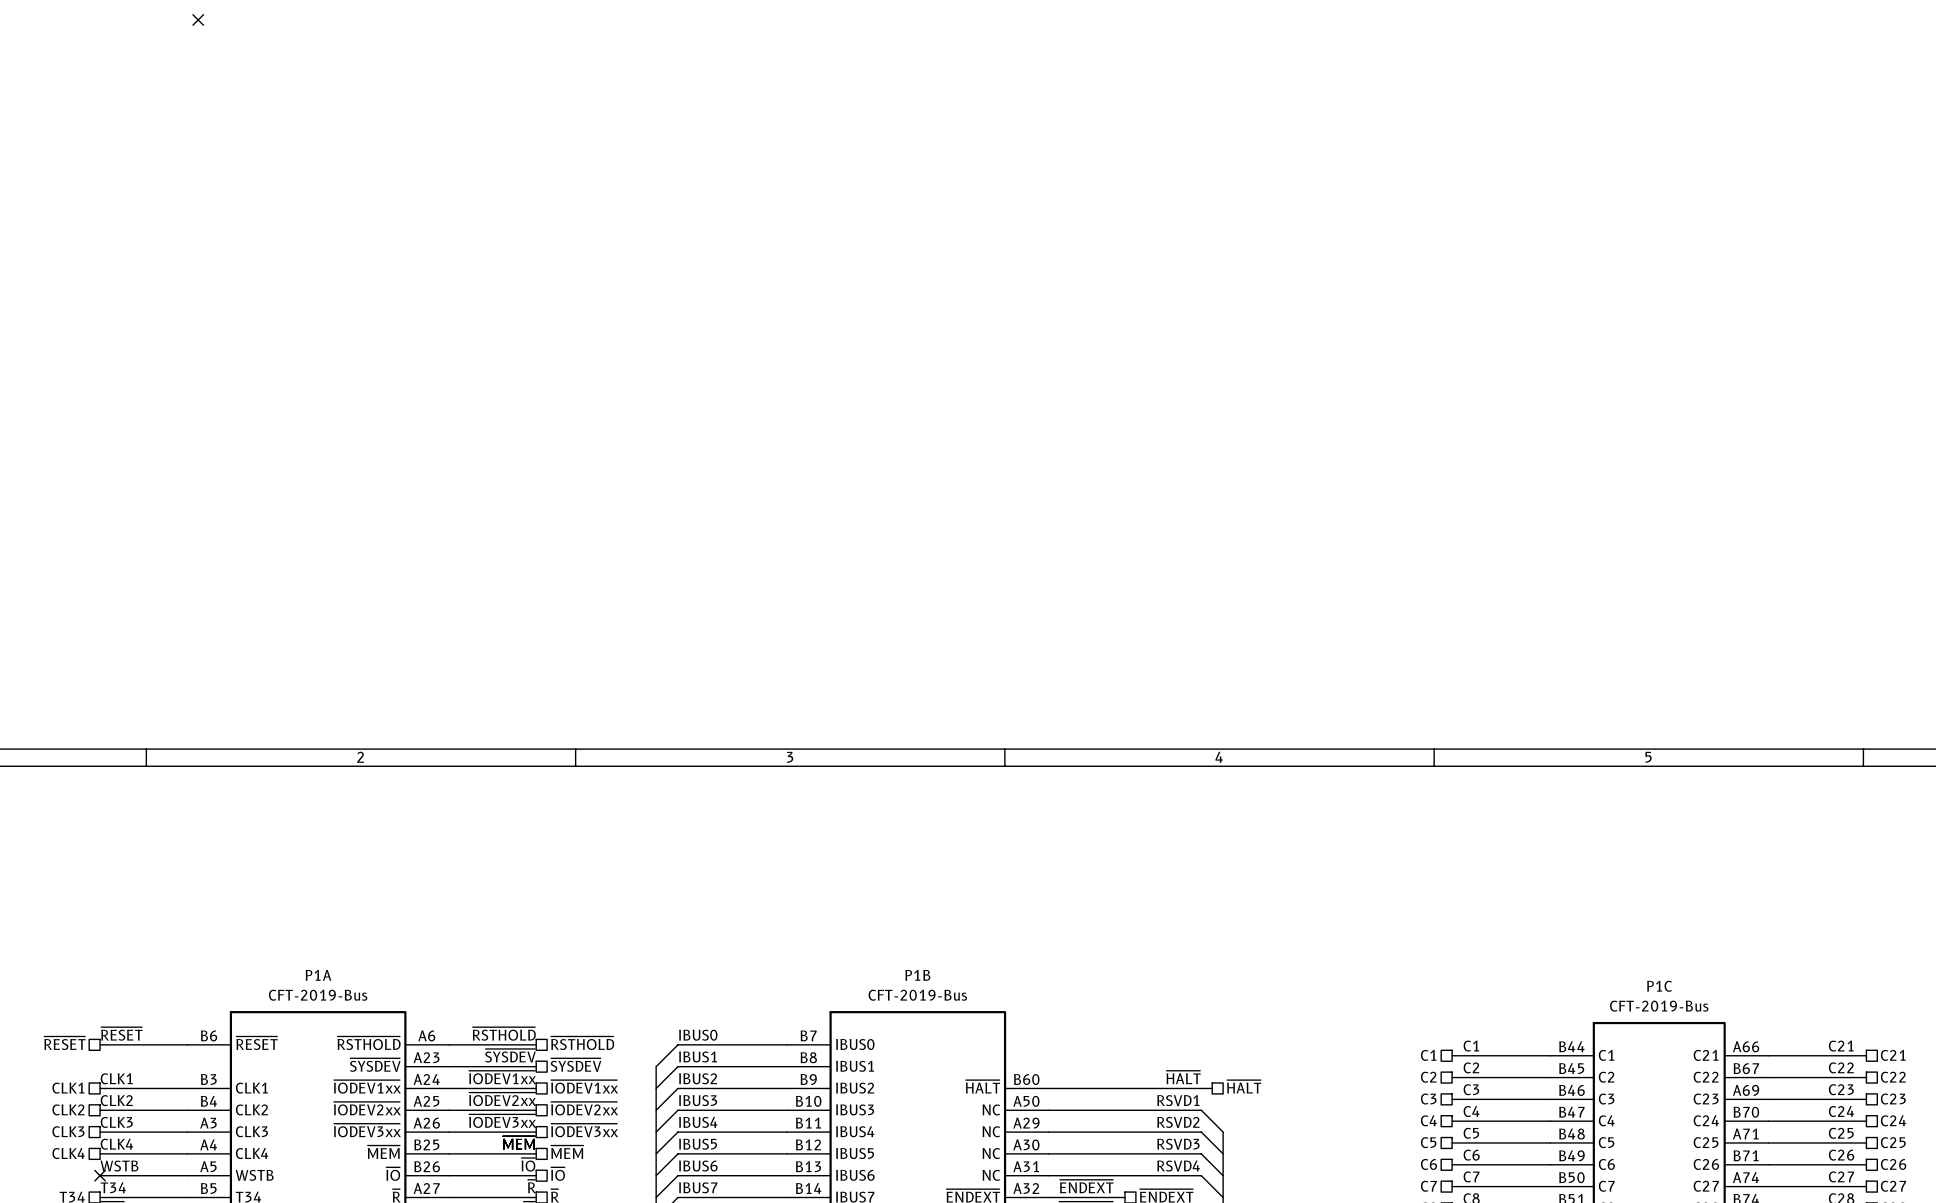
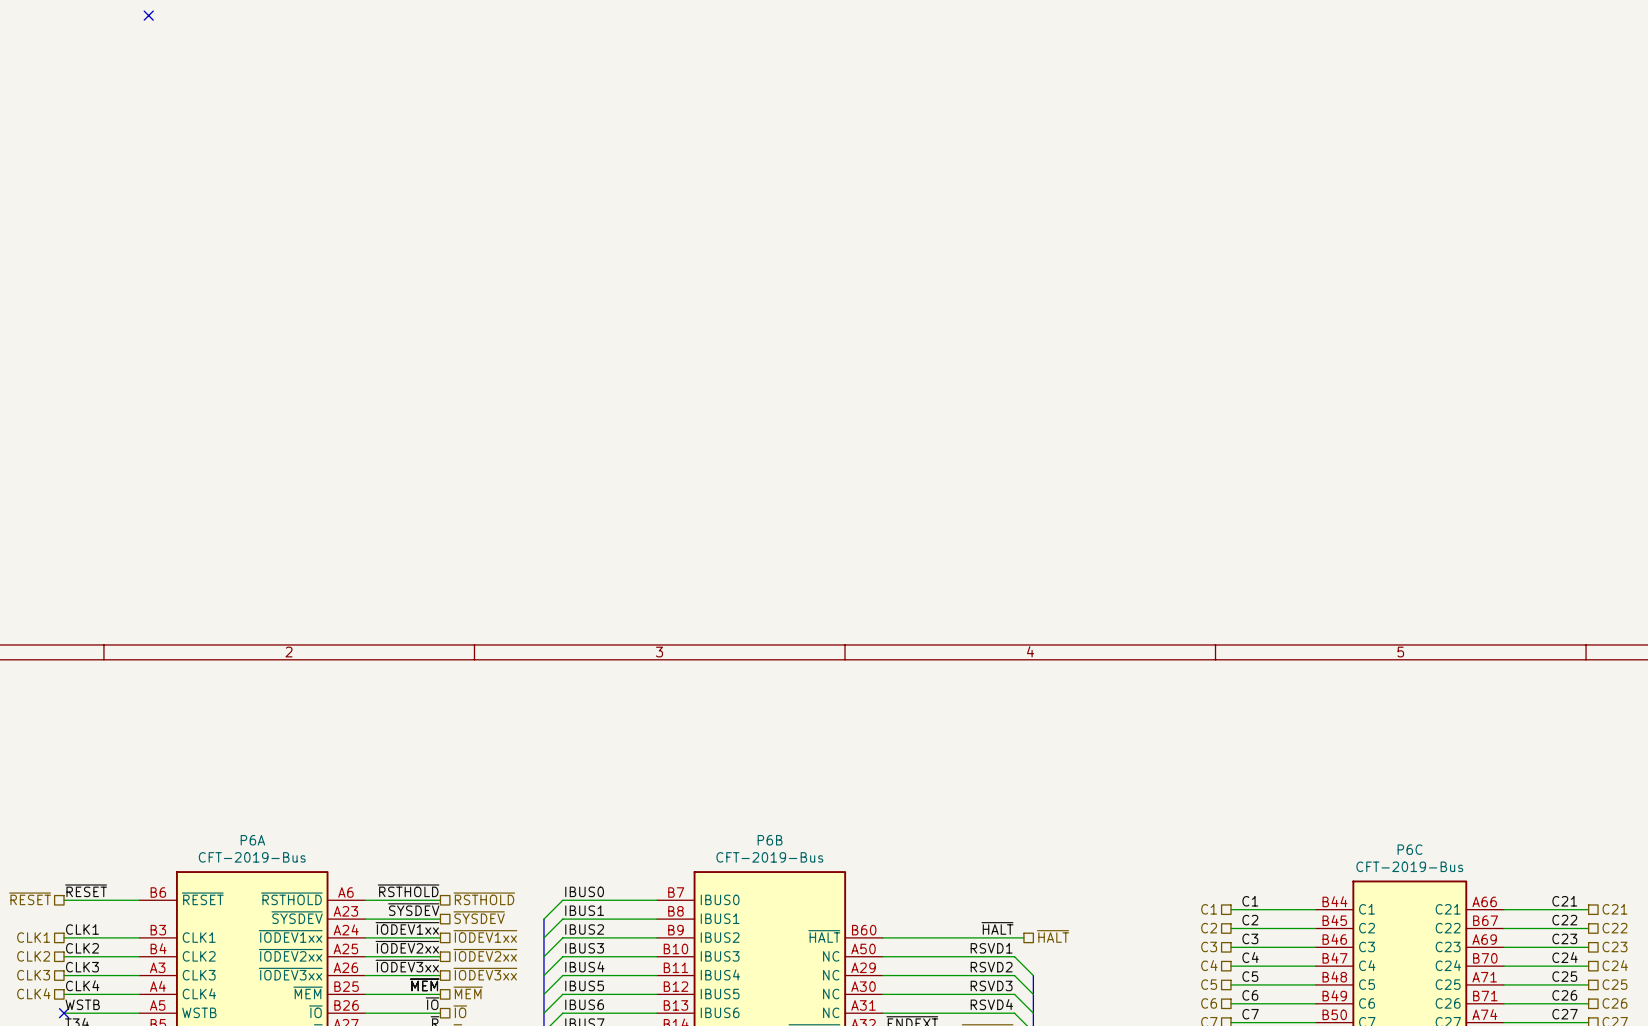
P1A name: P1A (318, 975) -> P6A (252, 840)
P1B name: P1B (917, 975) -> P6B (770, 840)
P1C name: P1C (1659, 986) -> P6C (1410, 849)

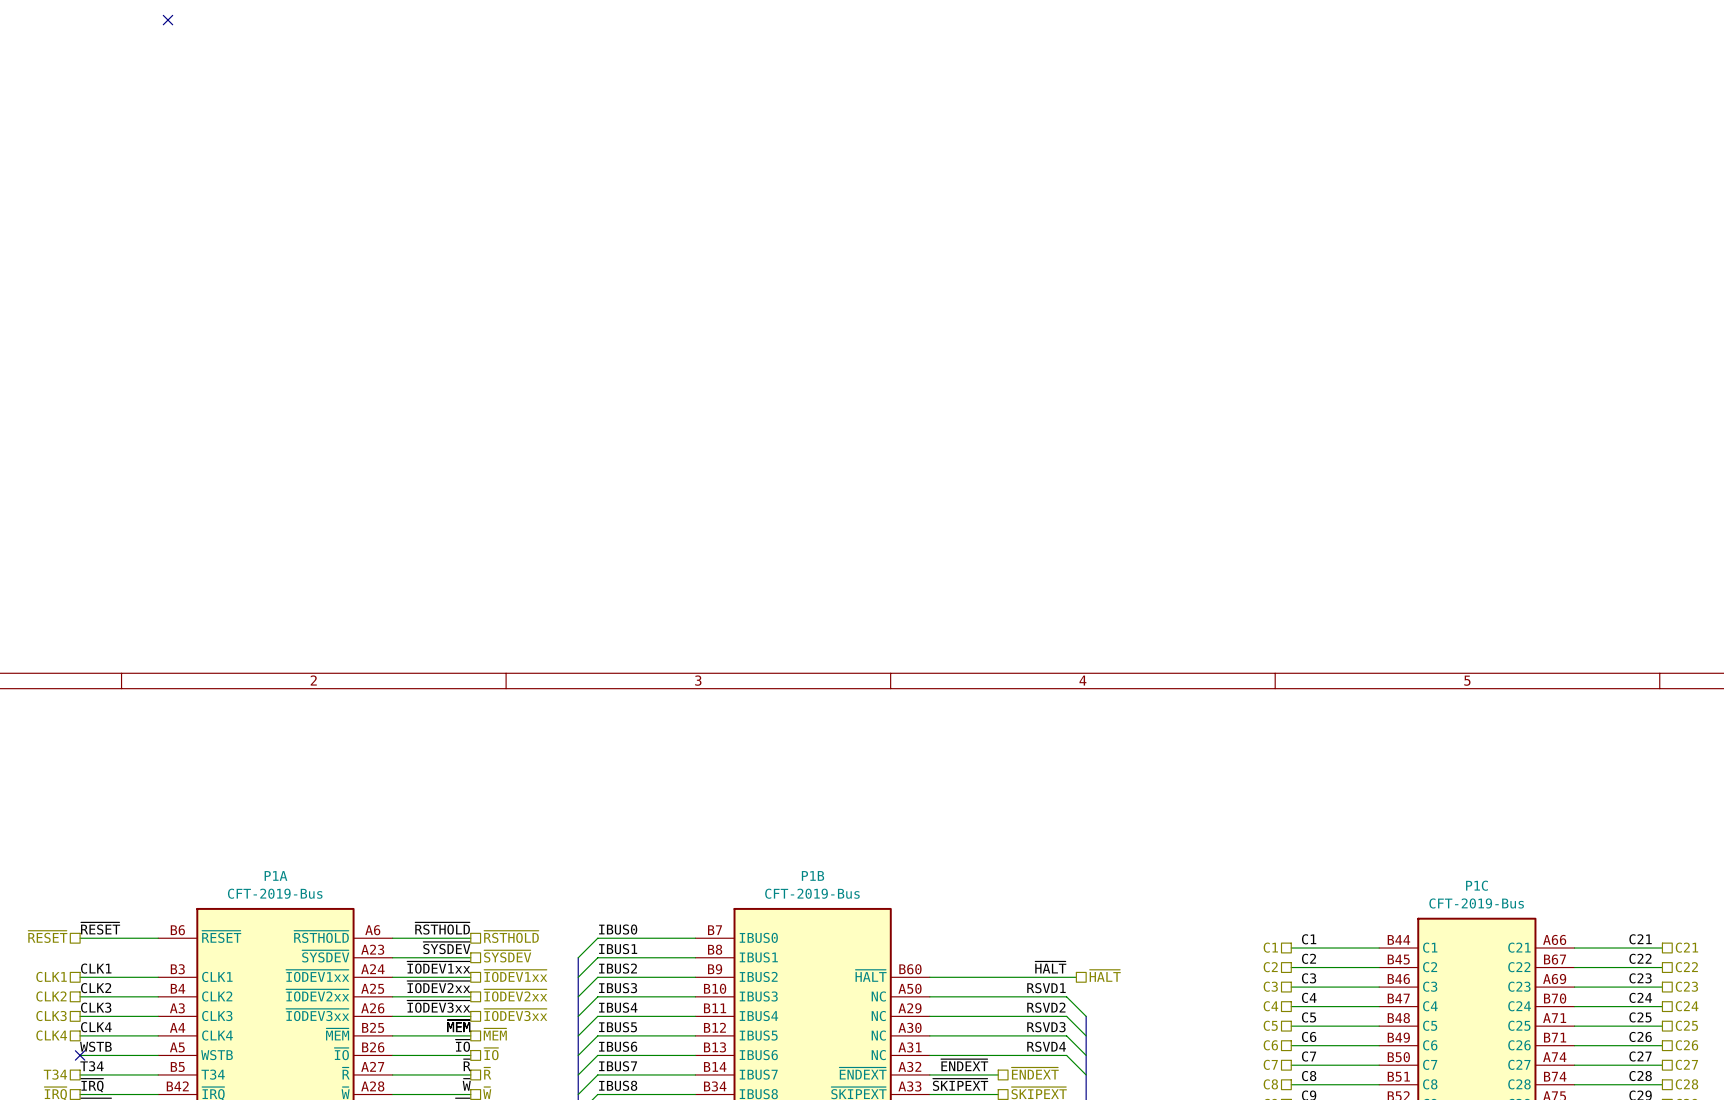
P6A name: P6A (252, 840) -> P1A (275, 875)
P6B name: P6B (770, 840) -> P1B (812, 875)
P6C name: P6C (1410, 849) -> P1C (1476, 885)

